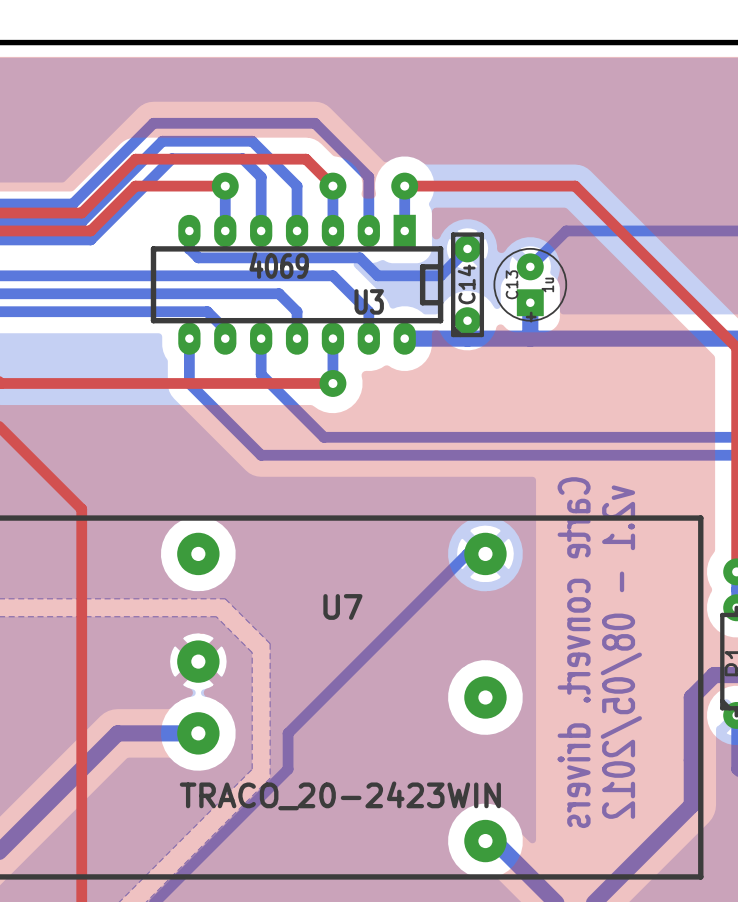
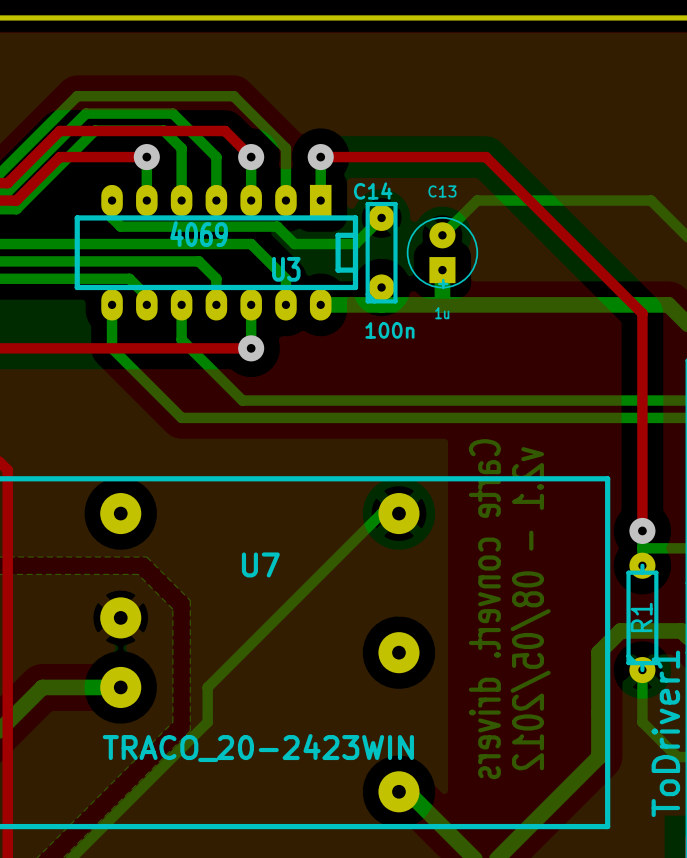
C14 name rotation: 0° (466, 284) -> 90° clockwise (373, 191)
C14 name position: C14 (466, 284) -> C14 (373, 191)
C13 name rotation: 0° (512, 284) -> 90° clockwise (442, 191)
C13 name position: C13 (512, 284) -> C13 (442, 191)
C13 value rotation: 0° (547, 285) -> 90° clockwise (442, 313)
C13 value position: 1u (547, 285) -> 1u (442, 313)
C14 value: none -> 100n (389, 330)

